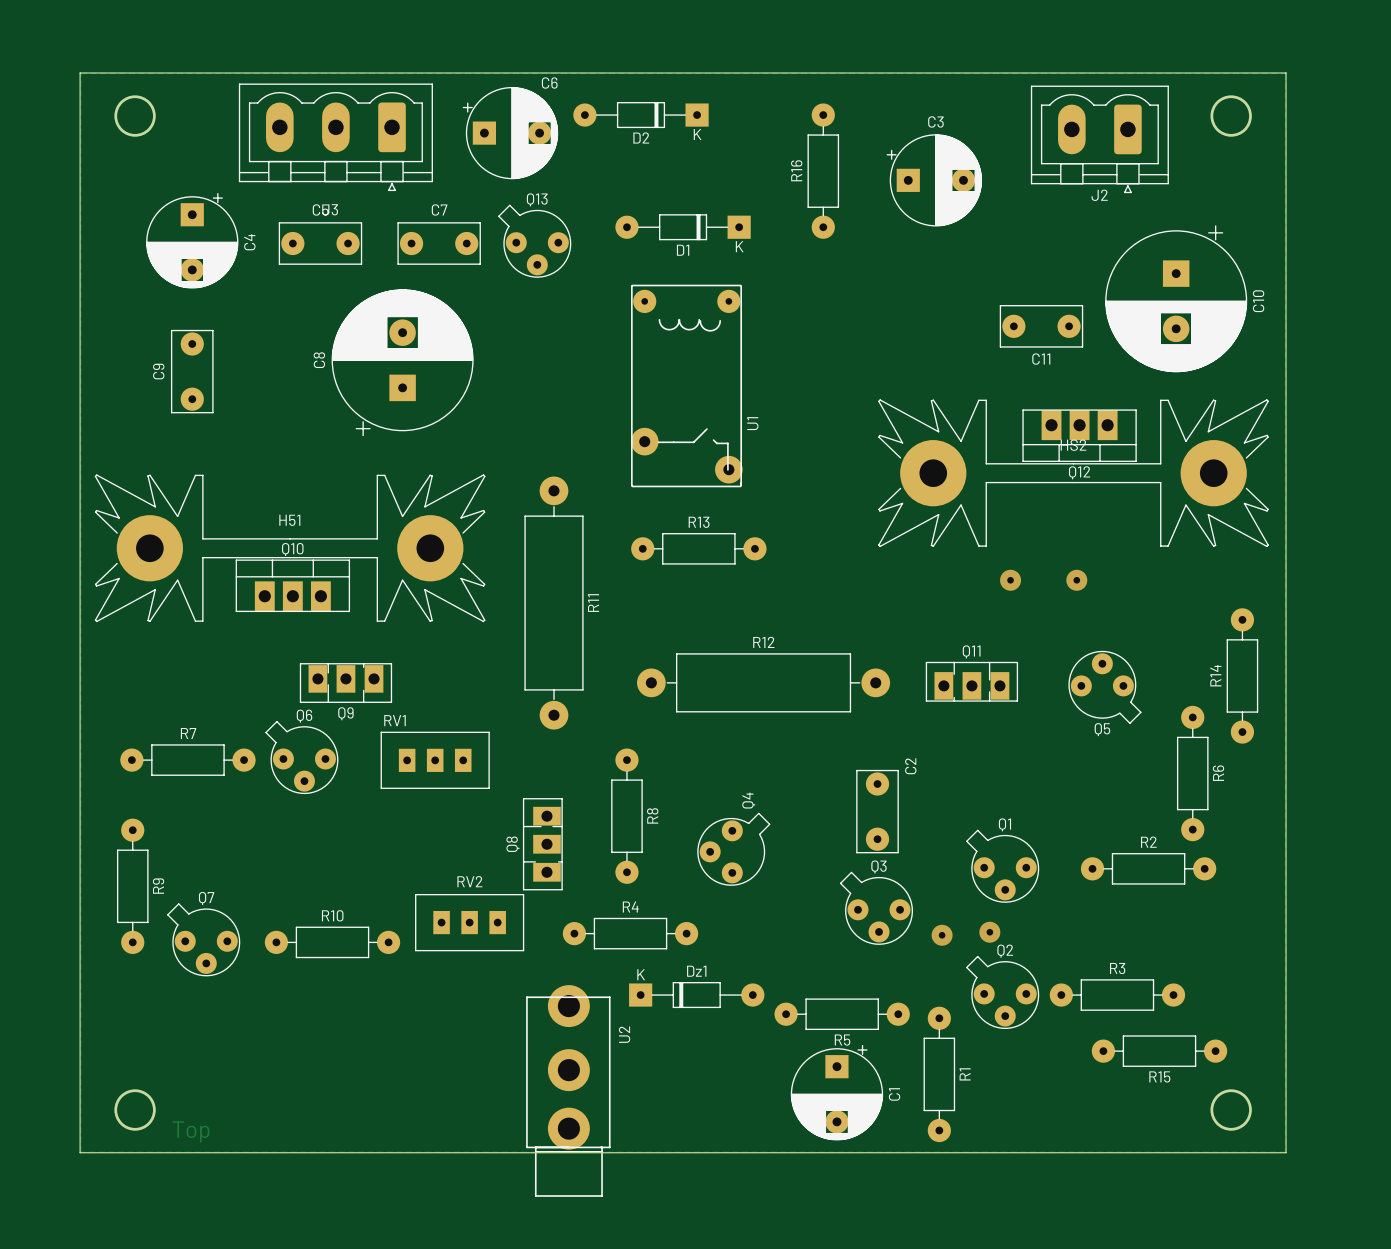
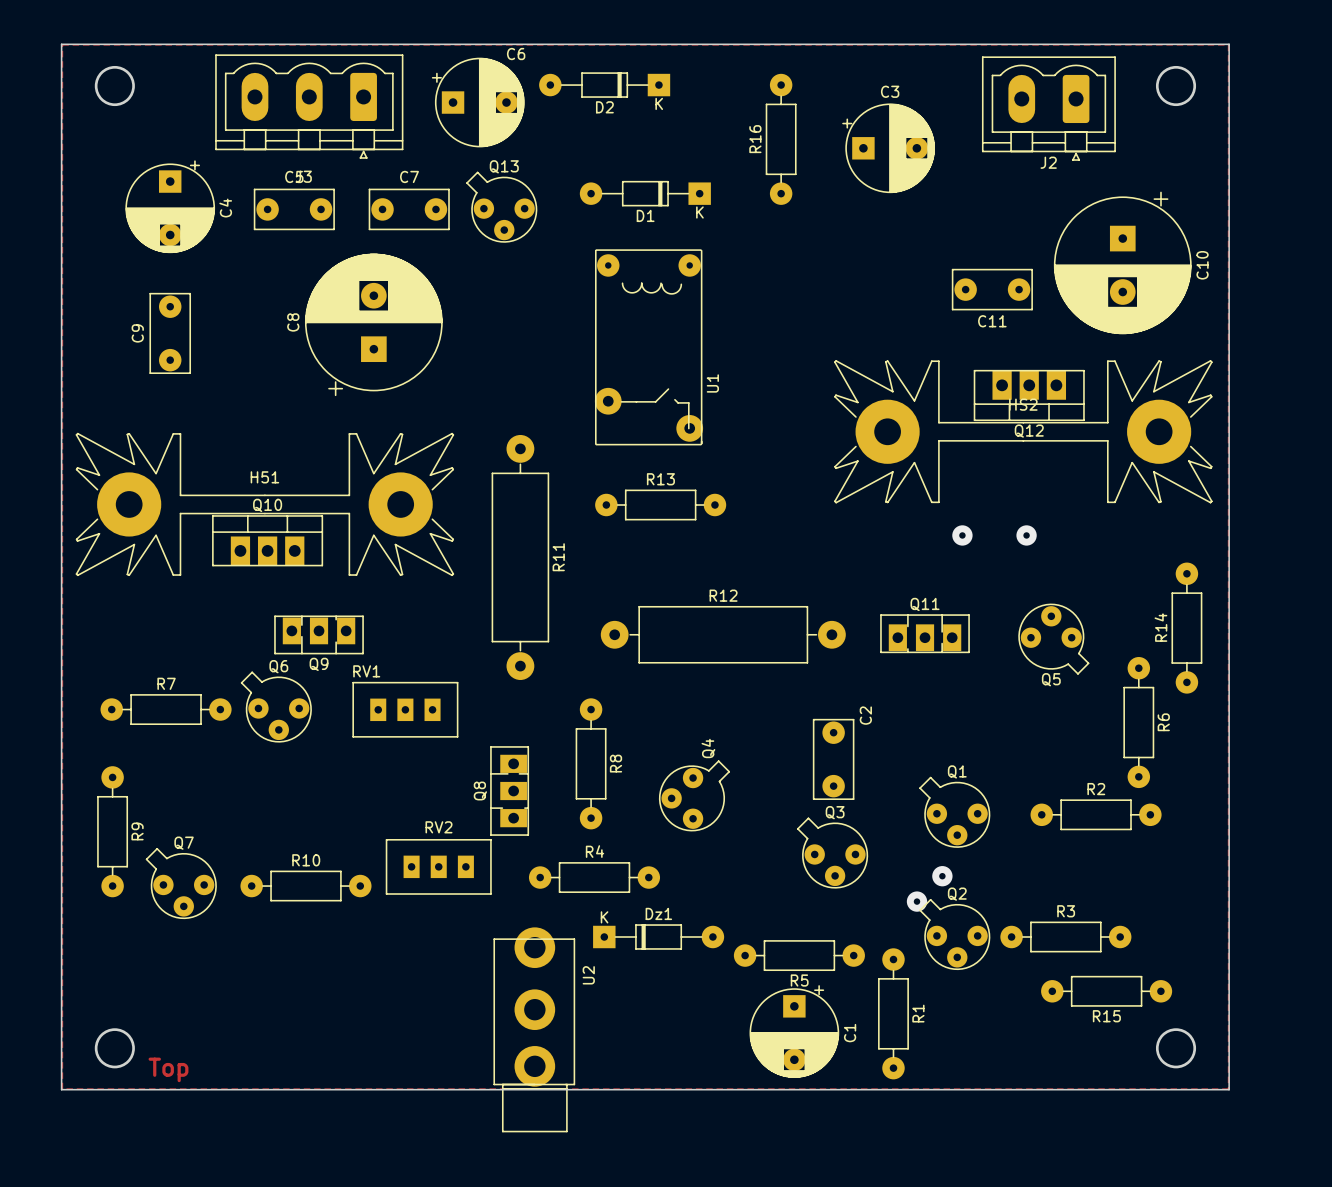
via position: (942, 935) -> (917, 901)

